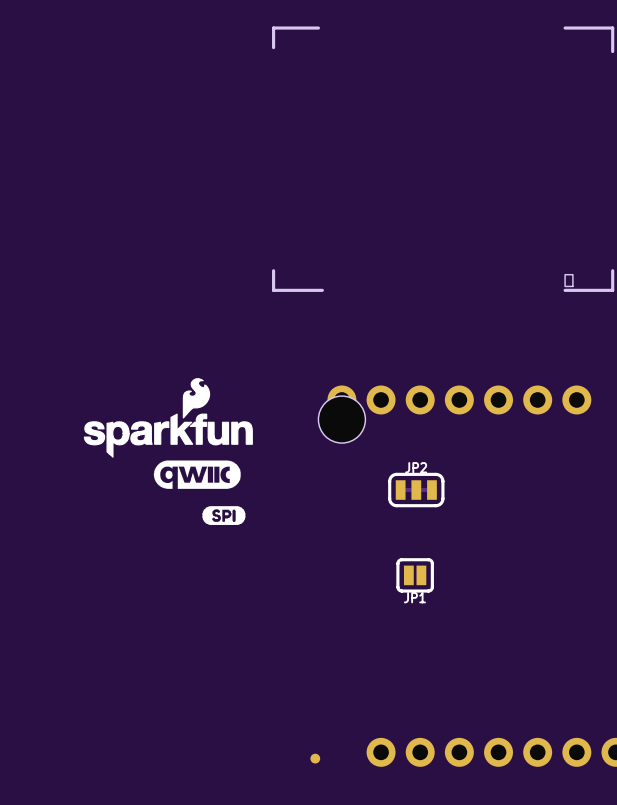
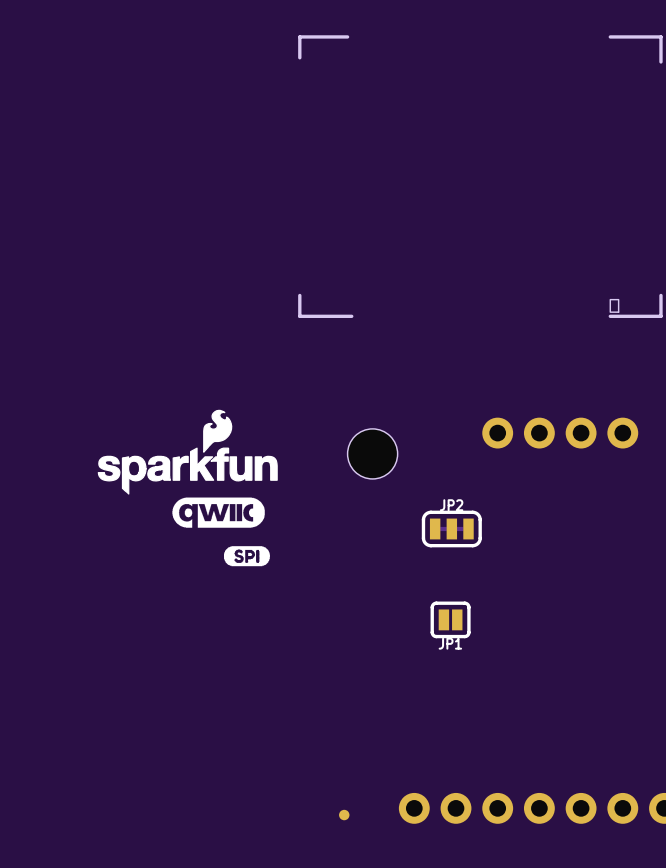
part: (459, 399) -> none

